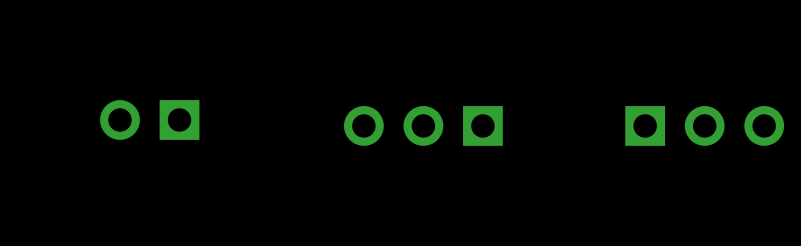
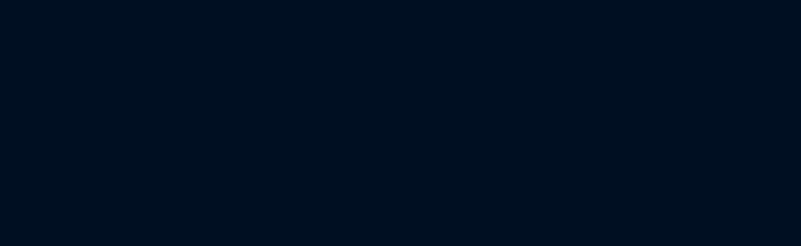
part: (149, 119) -> none
part: (423, 125) -> none
part: (704, 125) -> none

